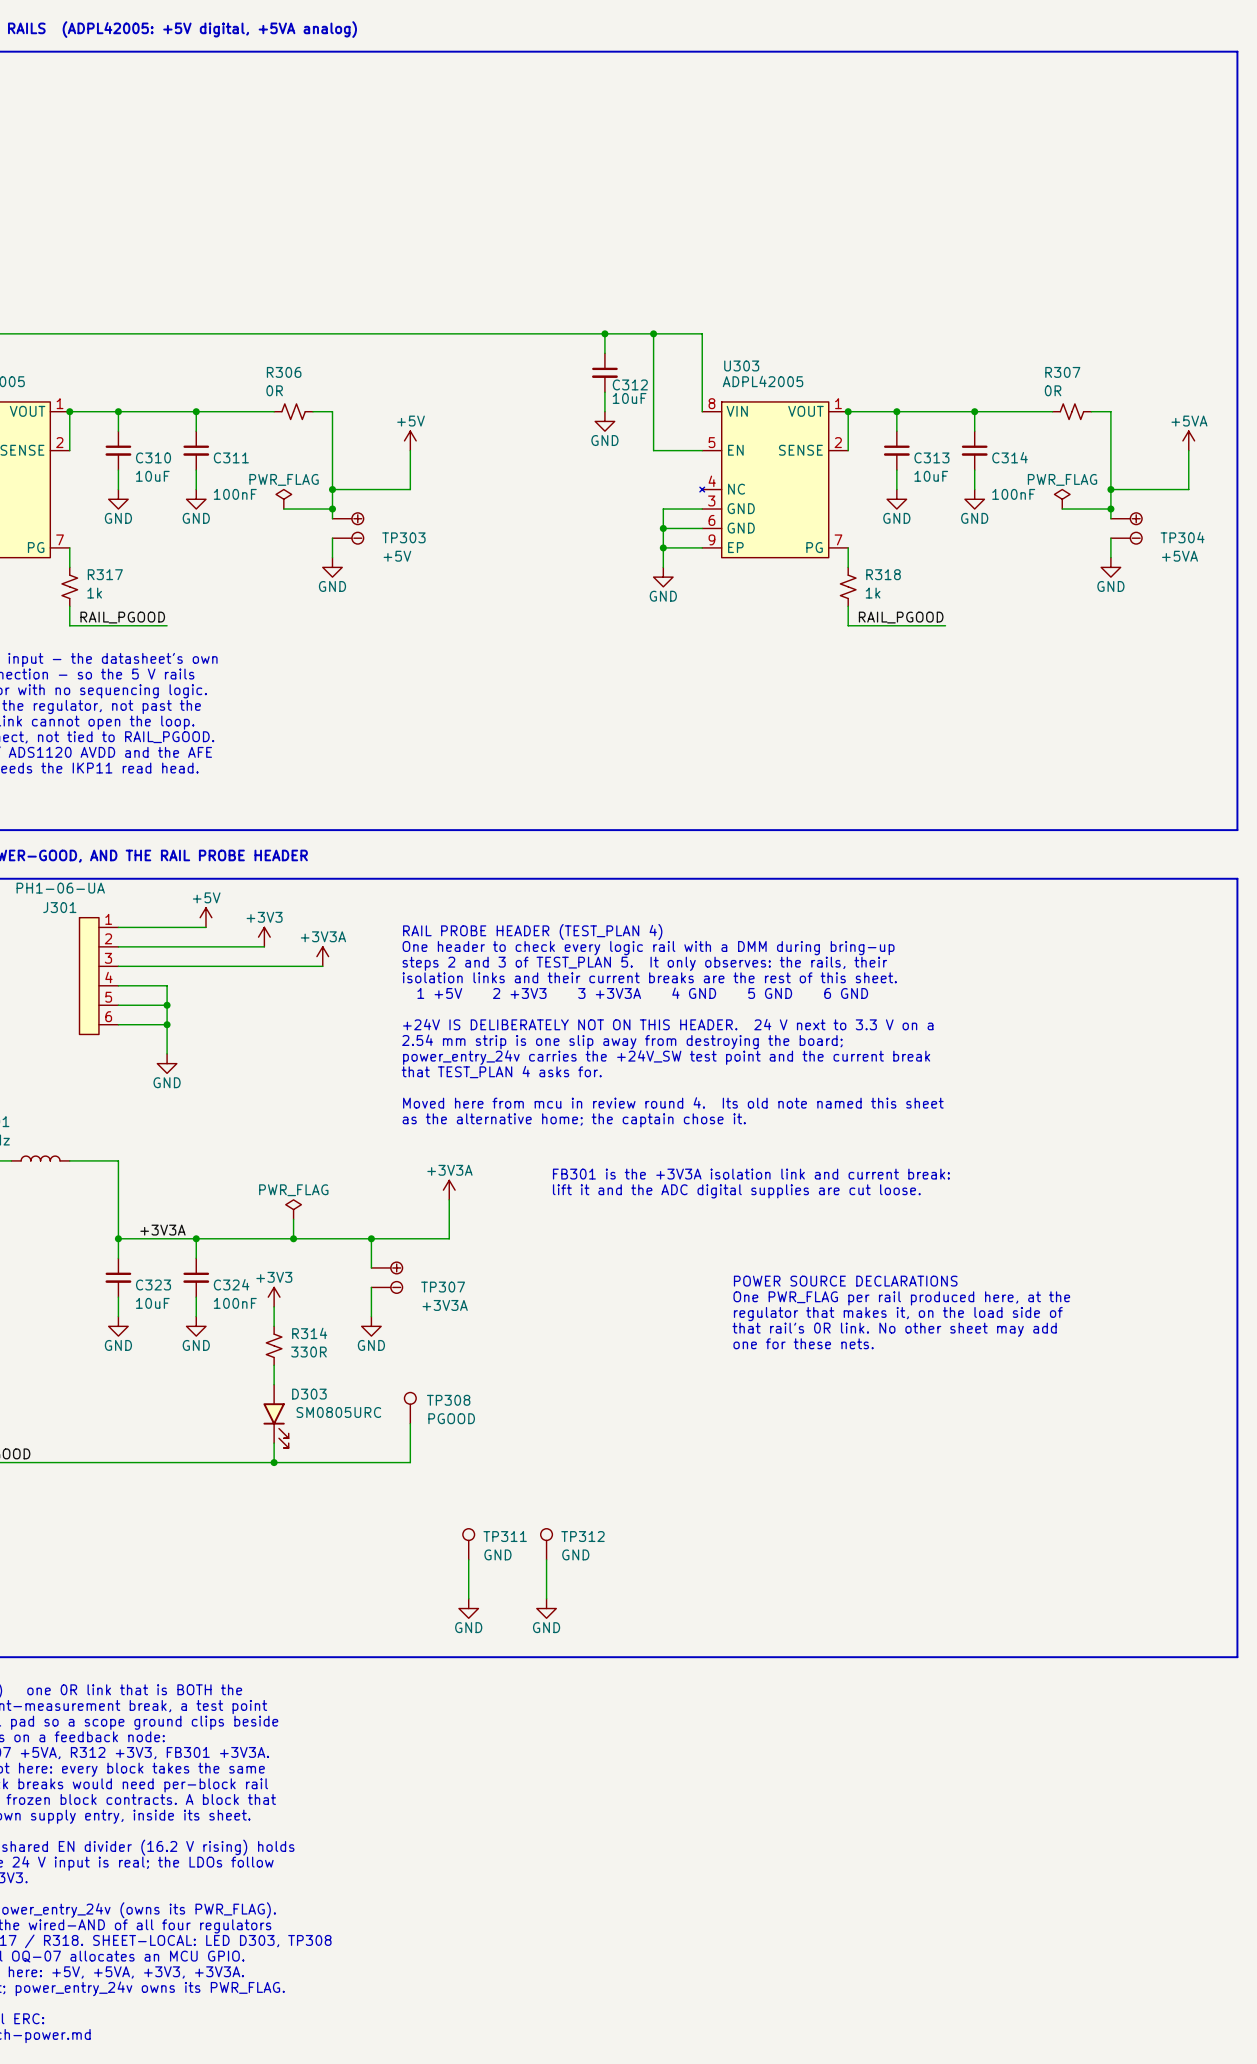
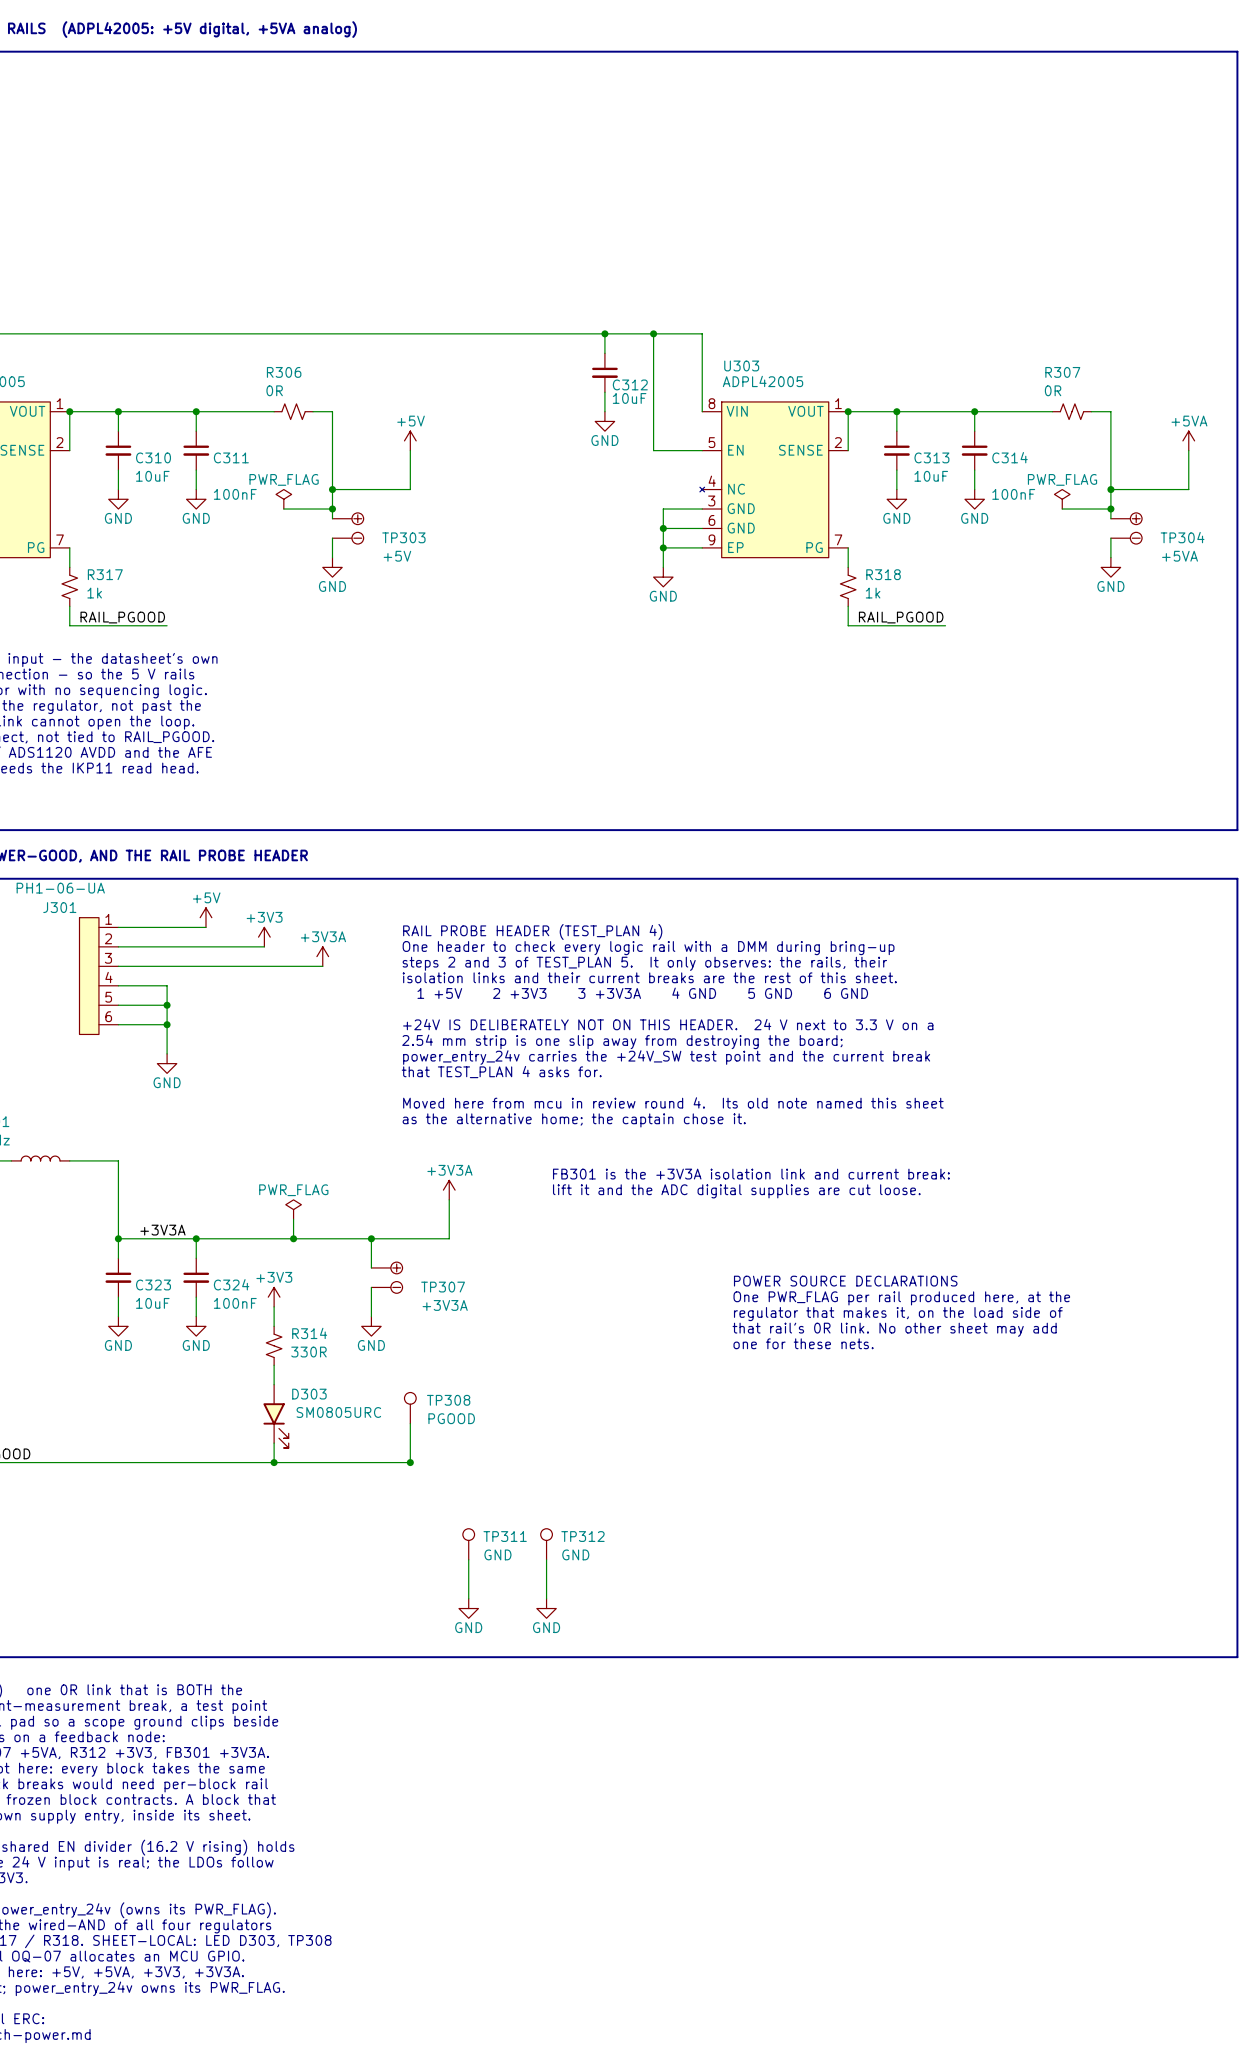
junction: none -> (410, 1462)

